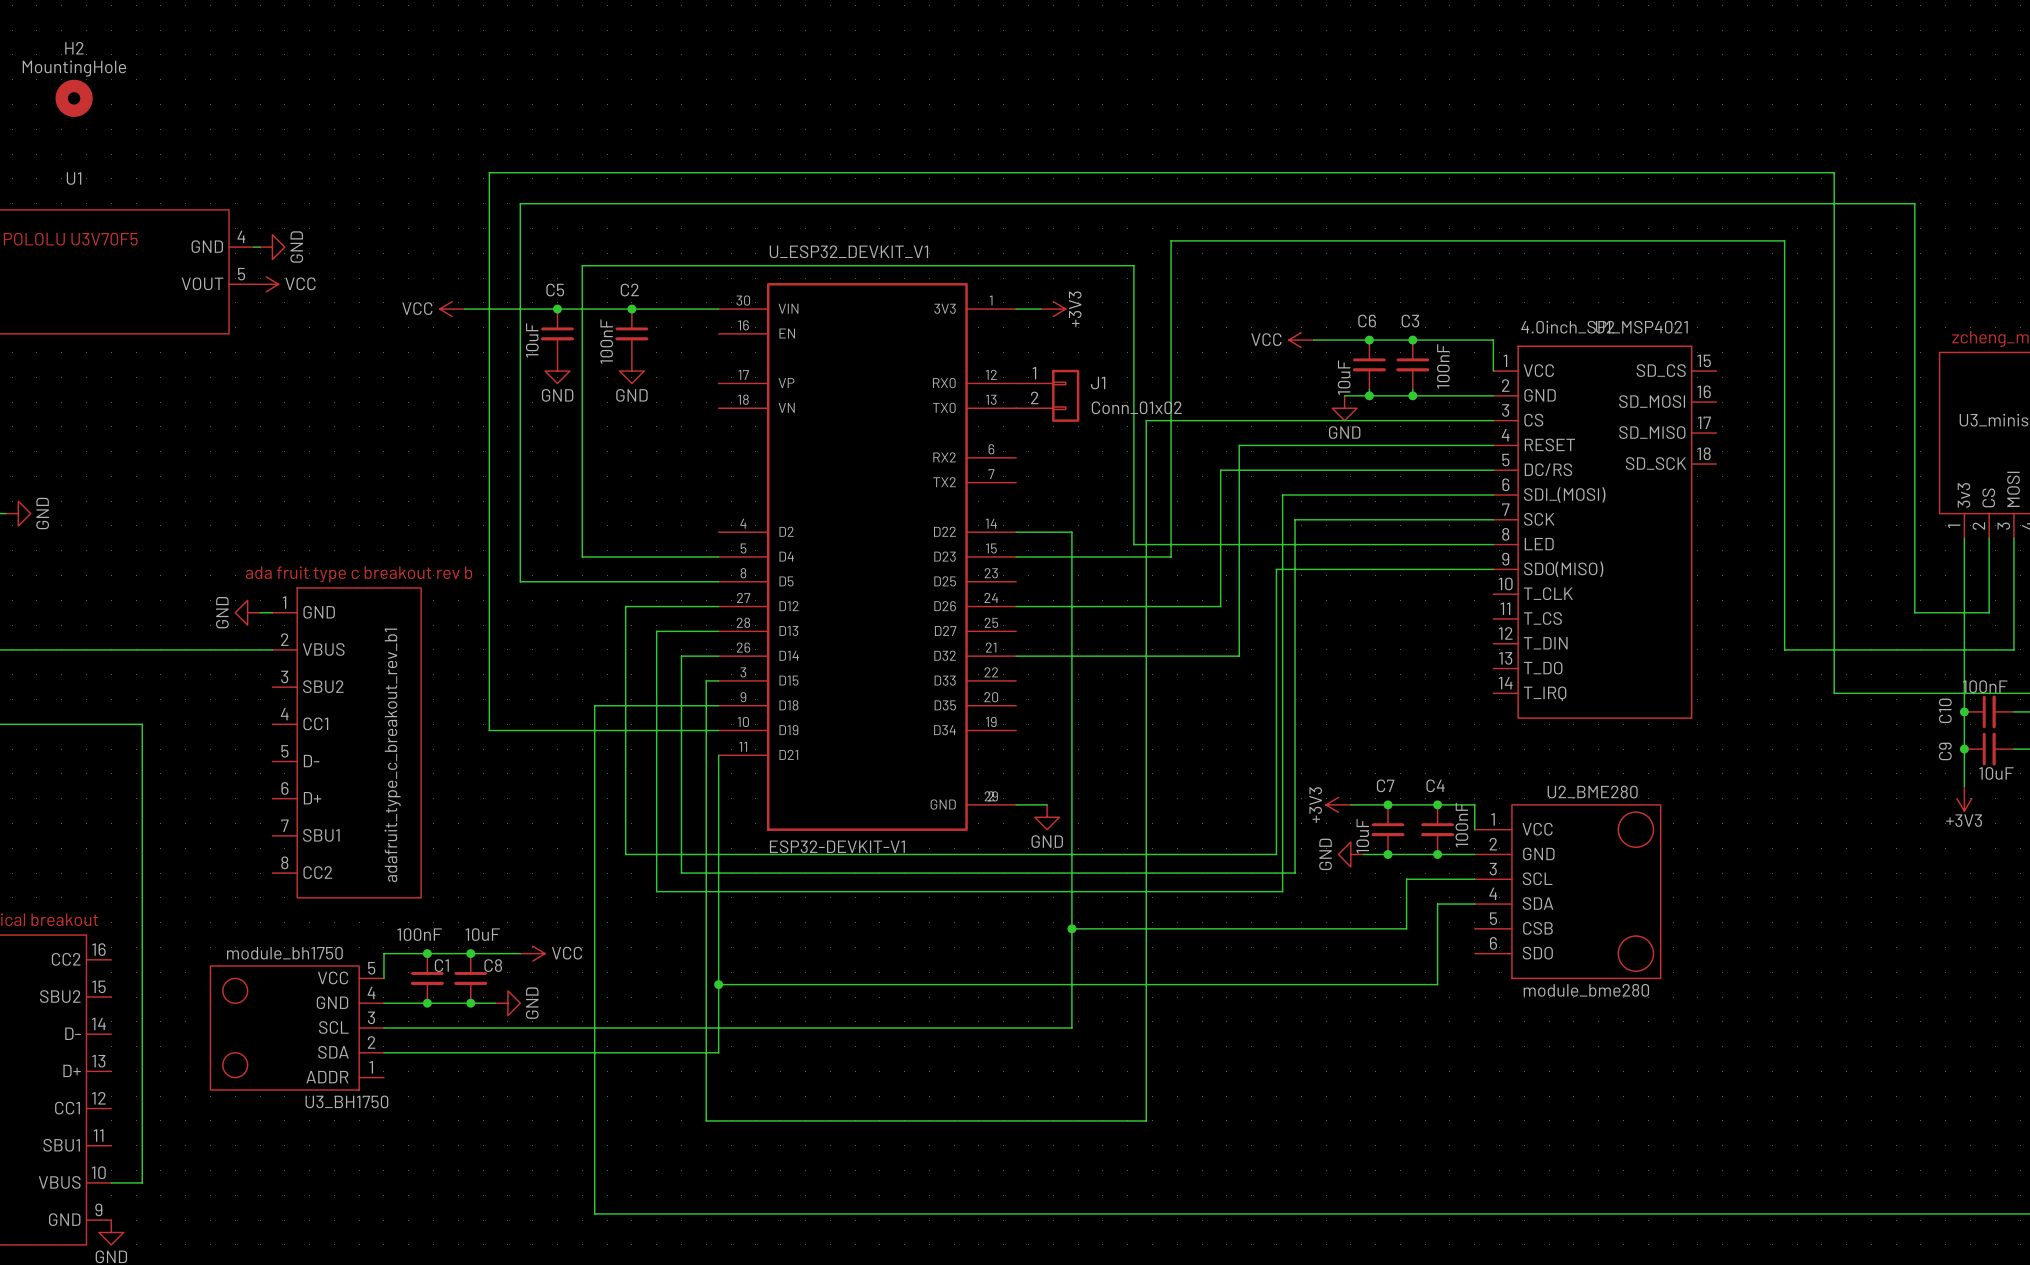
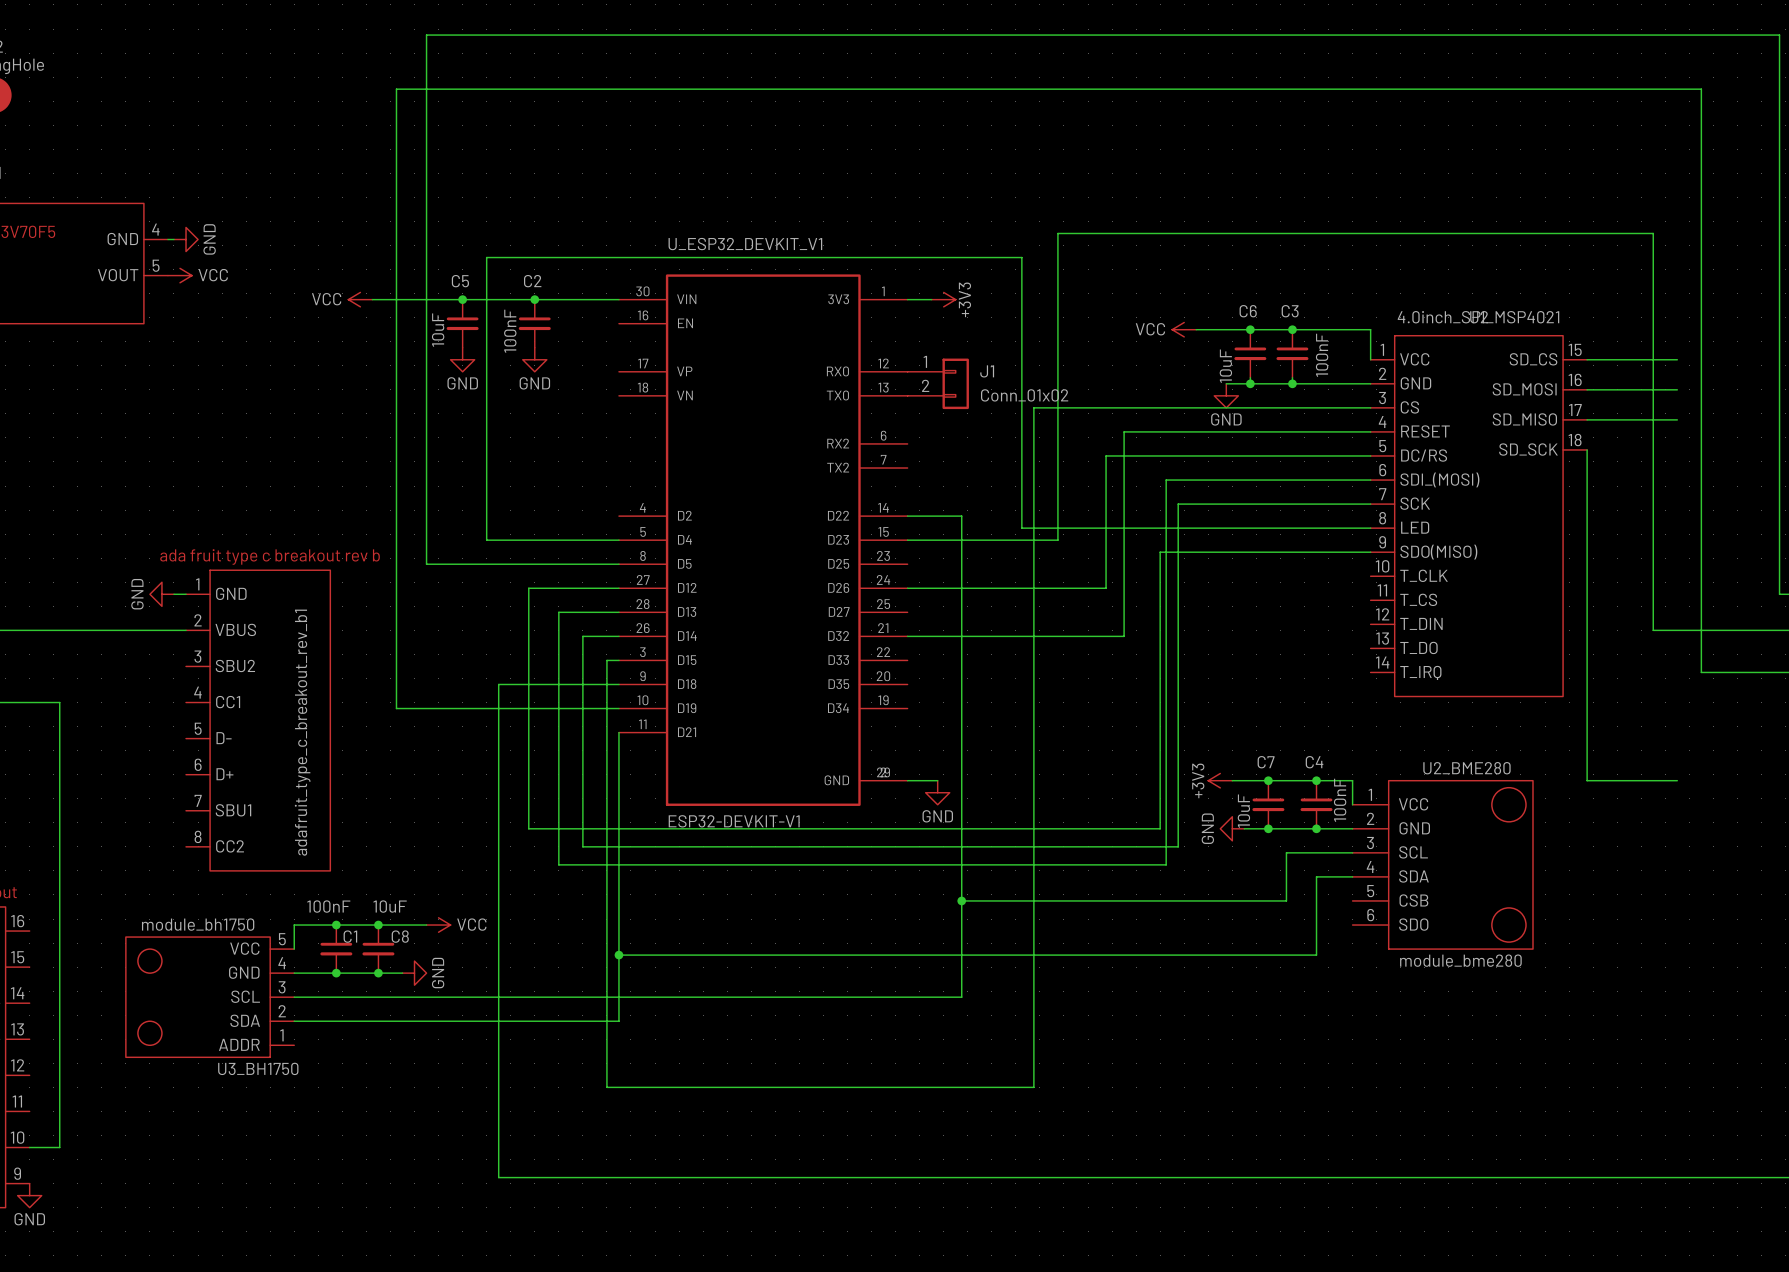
wire: (489, 172) (1834, 172) -> (396, 167) (396, 89) (1701, 89) (1701, 167)
wire: (520, 203) (1914, 203) -> (426, 197) (426, 35) (1779, 35) (1779, 197)
wire: none -> (1587, 359) (1677, 359)
wire: none -> (1587, 389) (1677, 389)
wire: none -> (1587, 419) (1677, 419)
wire: none -> (1587, 449) (1587, 780) (1677, 780)

